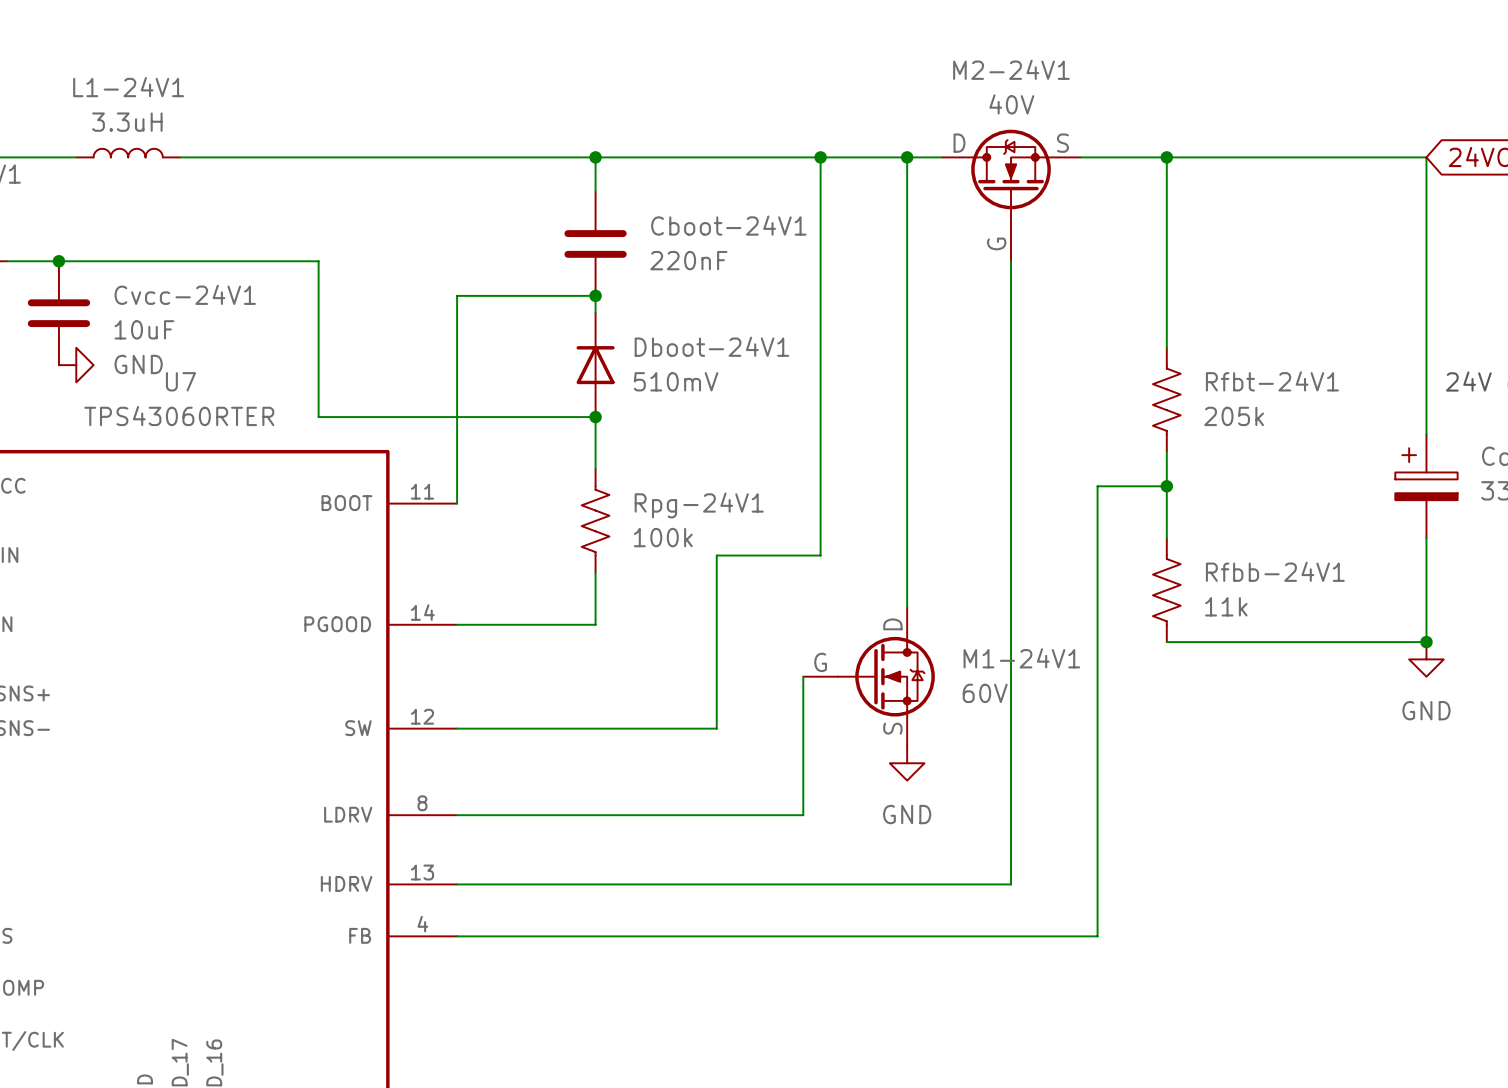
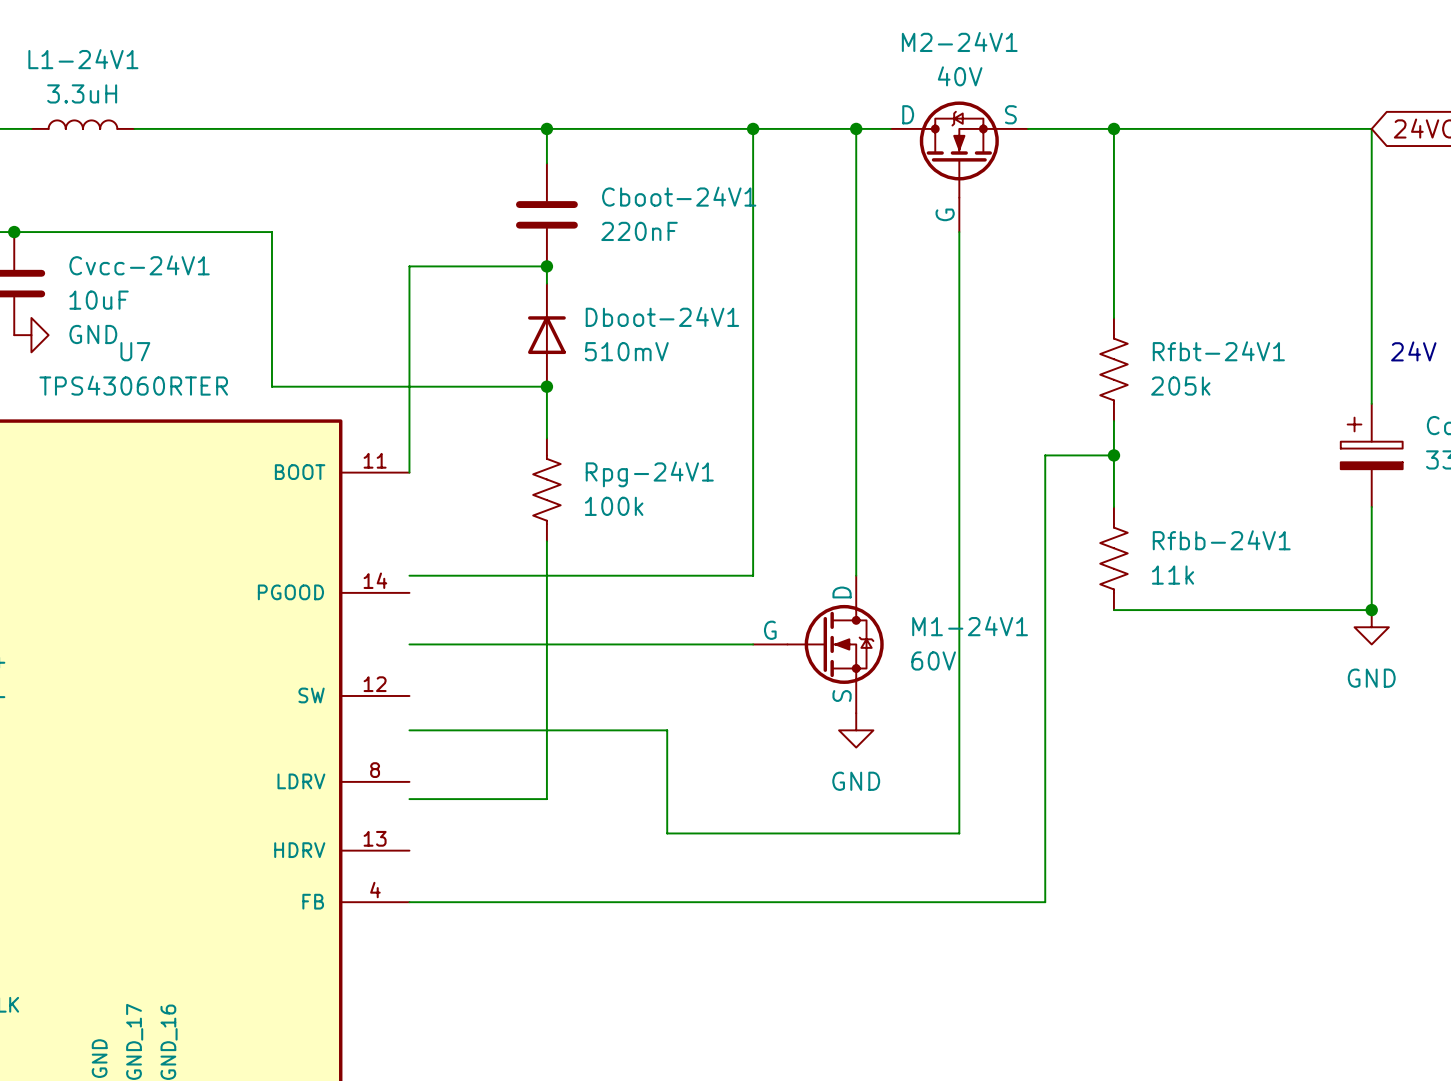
wire: none -> (753, 128) (753, 575) (409, 575)
wire: (820, 157) (820, 555) (716, 555) (716, 728) (457, 728) -> none
junction position: (820, 157) -> (753, 128)
wire: (457, 624) (595, 624) -> (409, 799) (546, 799) (546, 592)
wire: (803, 676) (803, 815) (457, 815) -> (753, 644) (409, 644)
wire: (1011, 867) (1011, 884) (457, 884) -> (959, 833) (667, 833) (667, 730) (409, 730)

